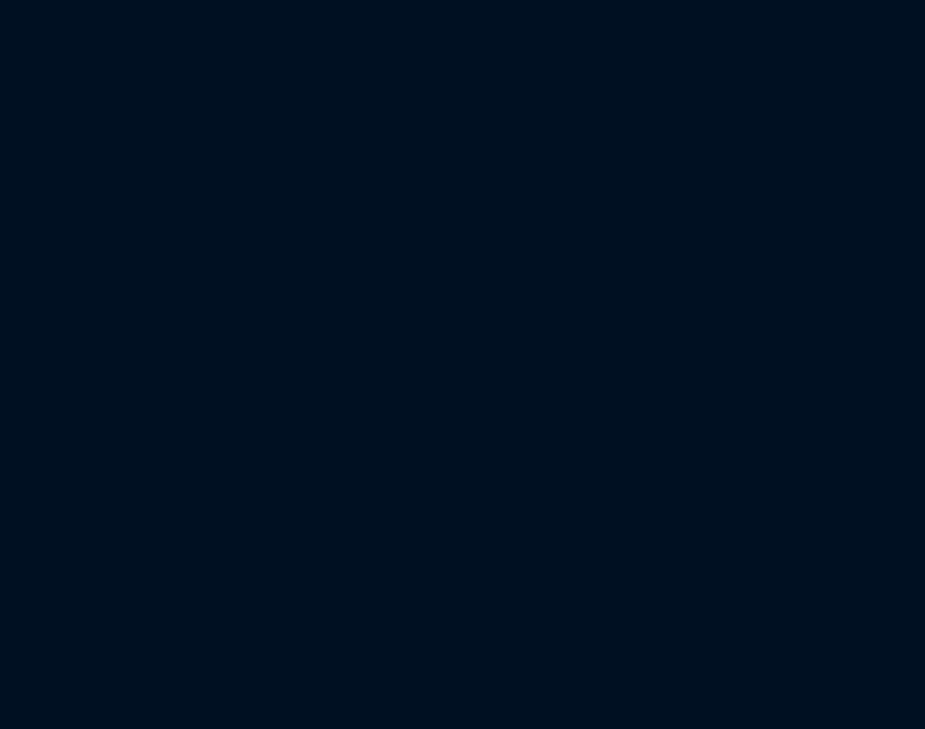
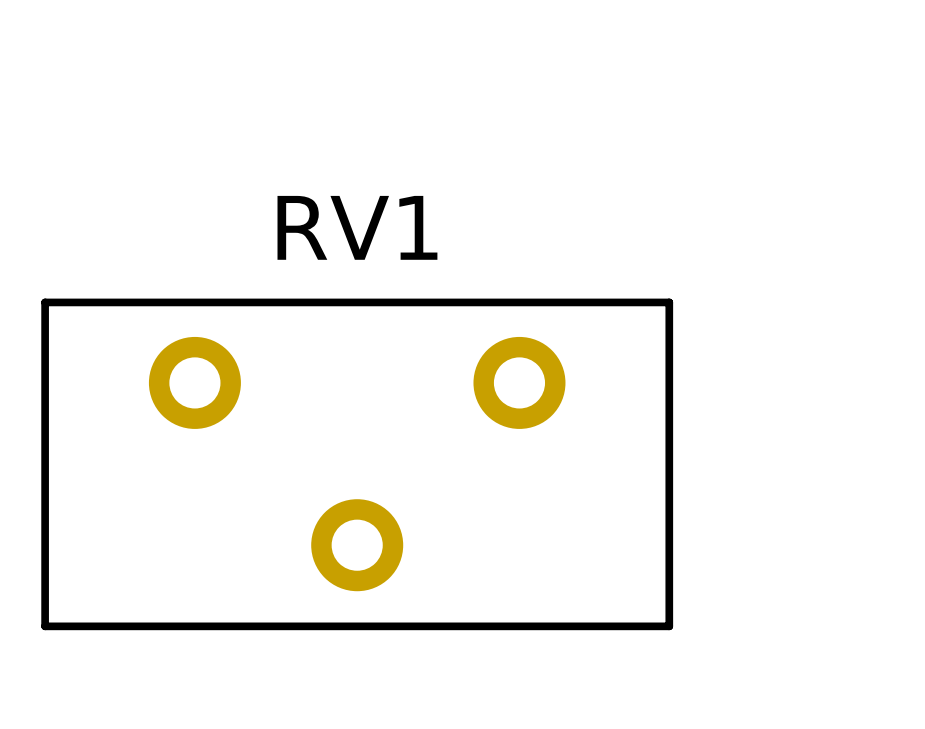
RV1: none -> (357, 464)

